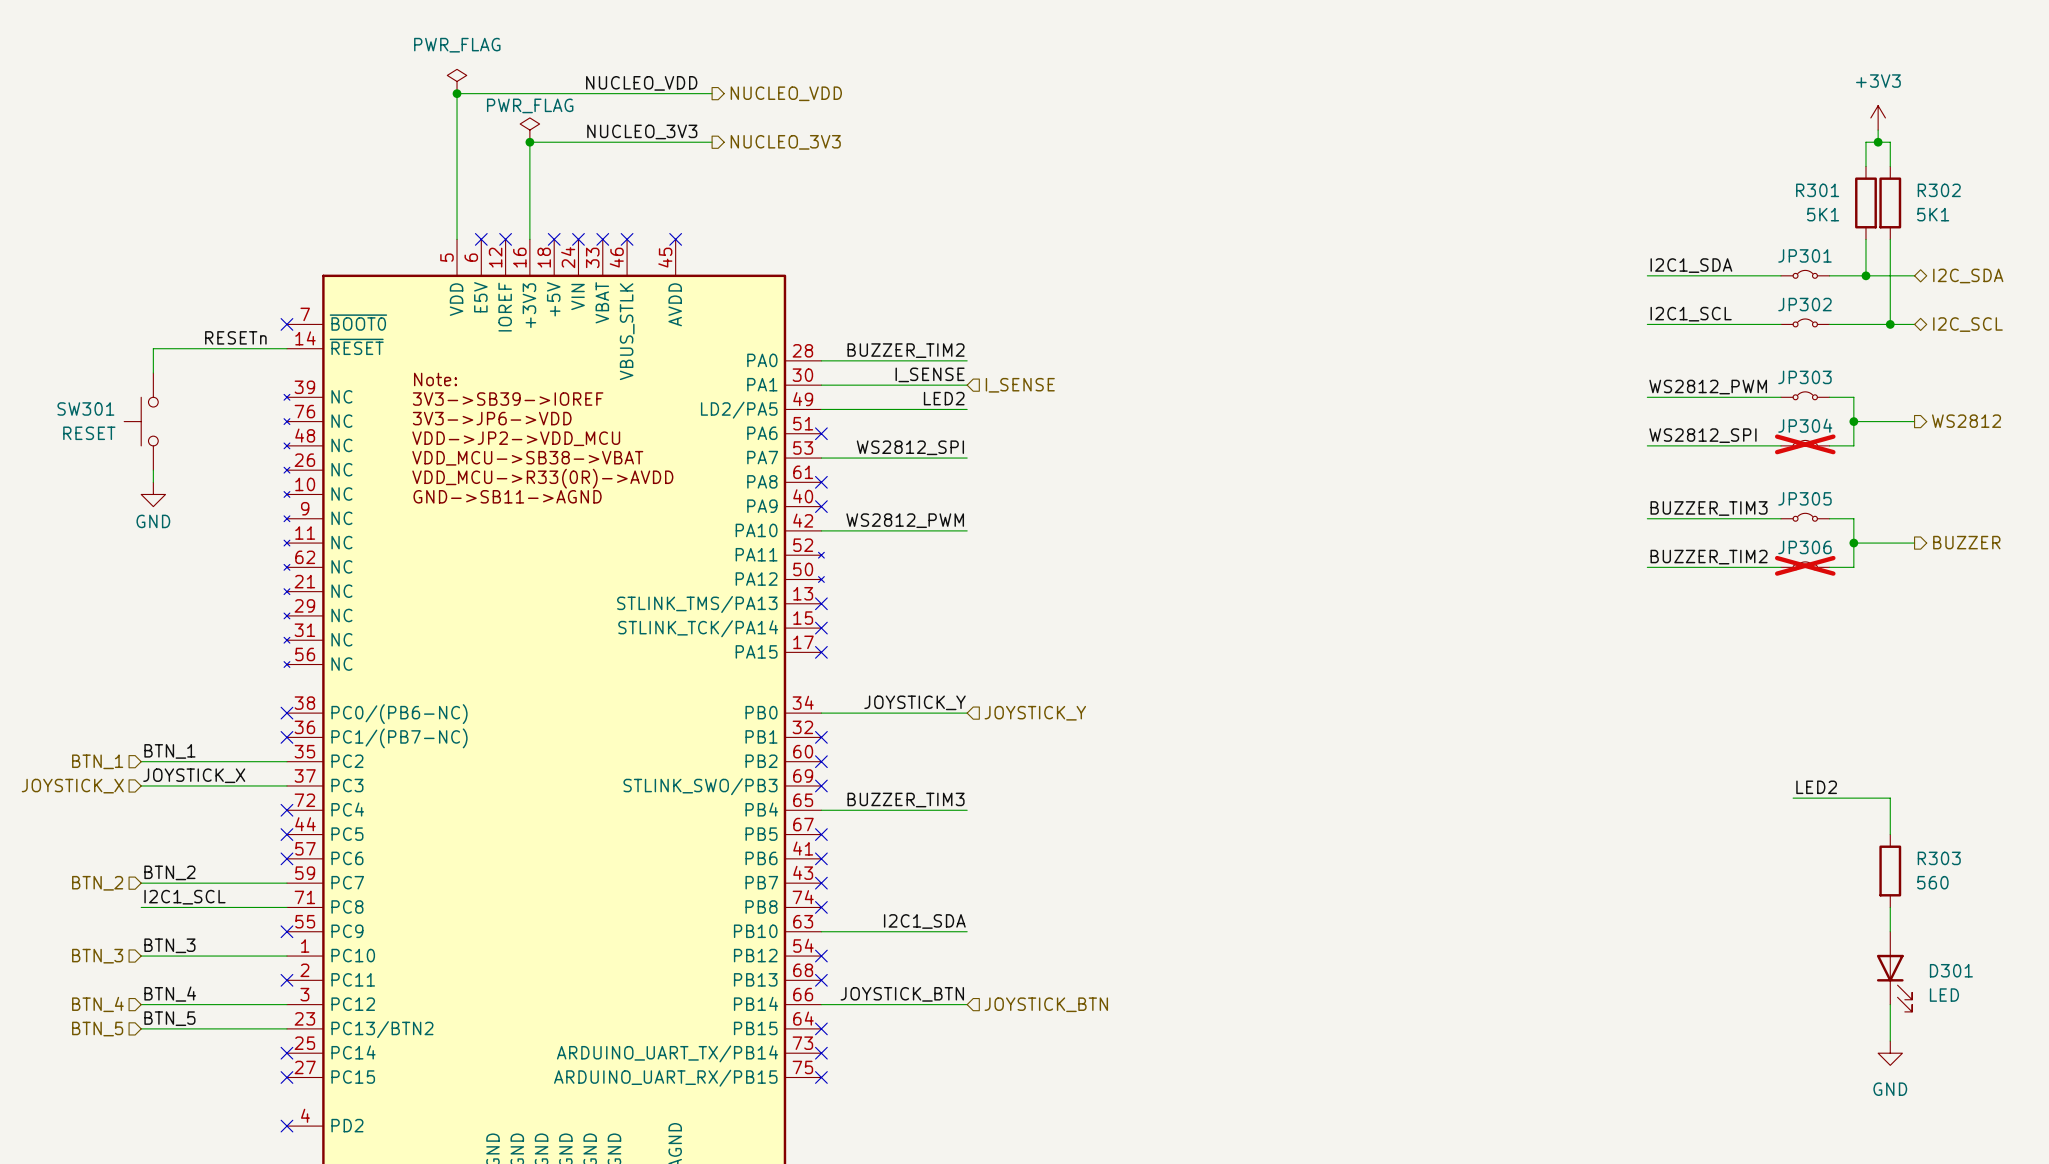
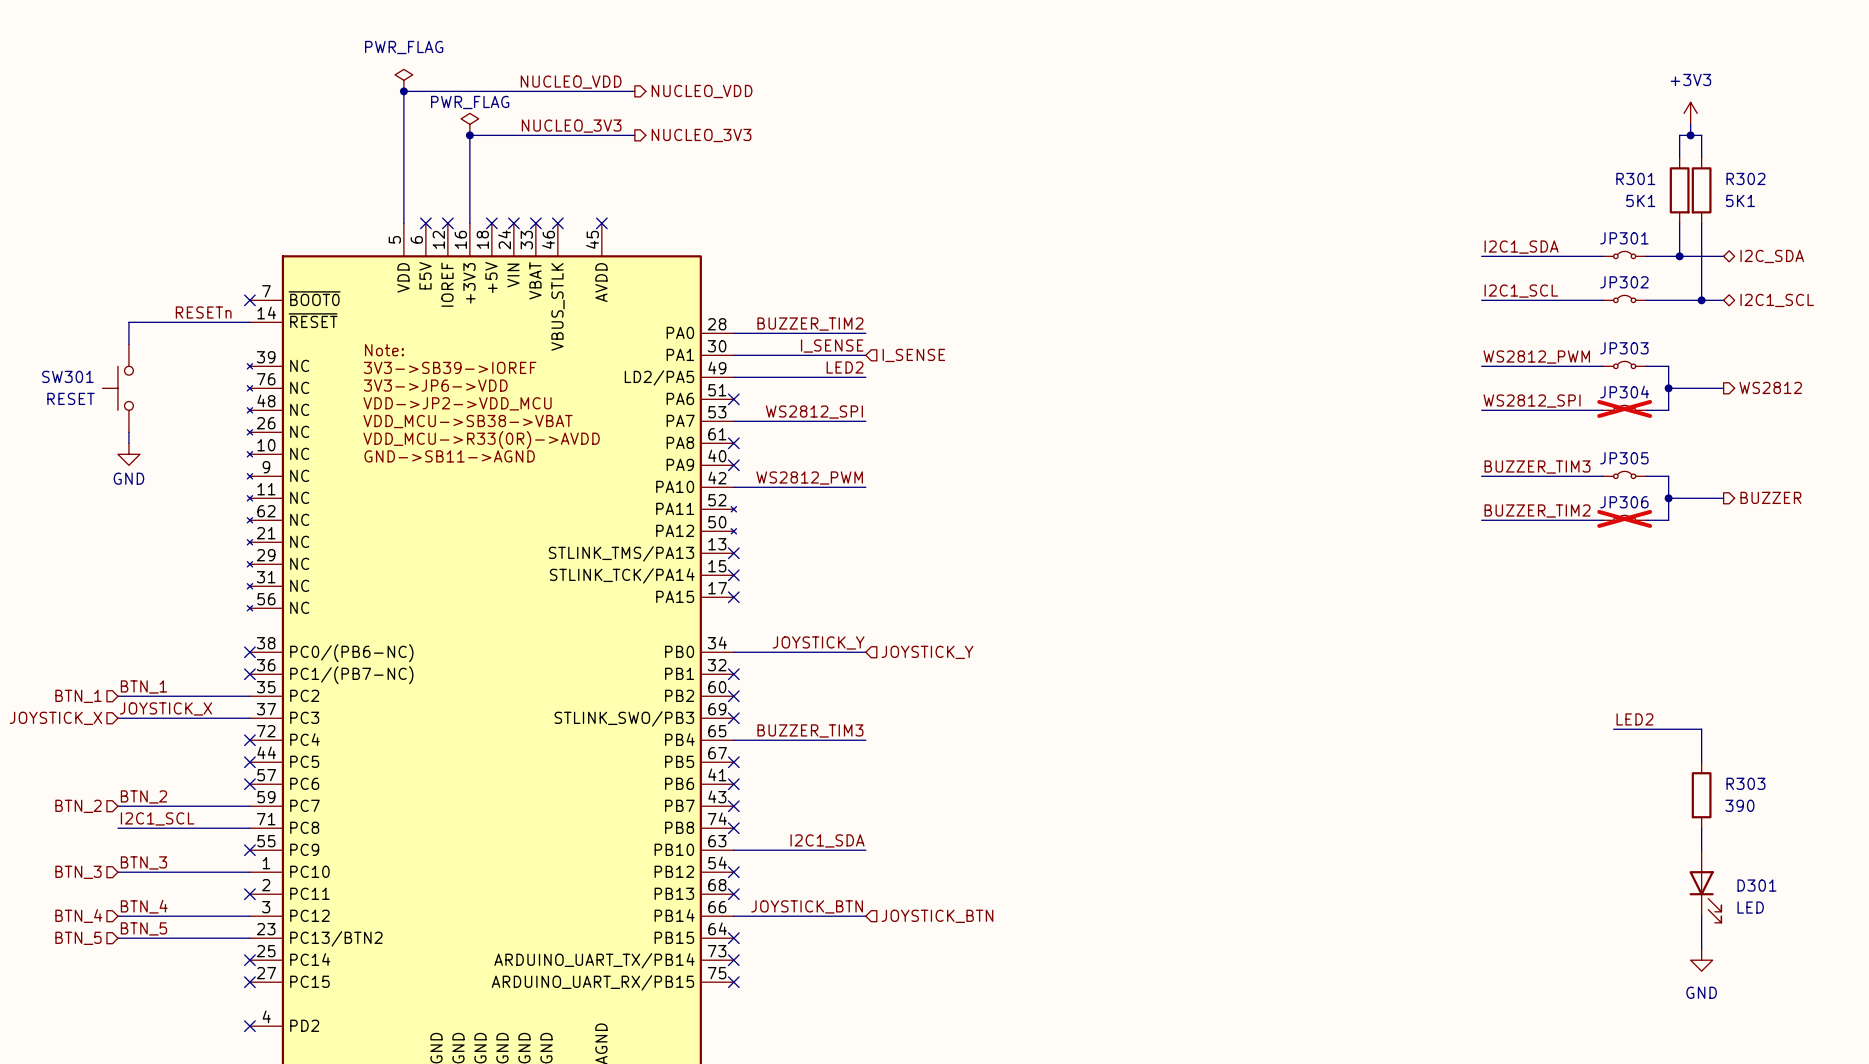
hierarchical label: I2C_SCL (1967, 324) -> I2C1_SCL (1777, 300)
R303 value: 560 (1932, 882) -> 390 (1739, 805)

